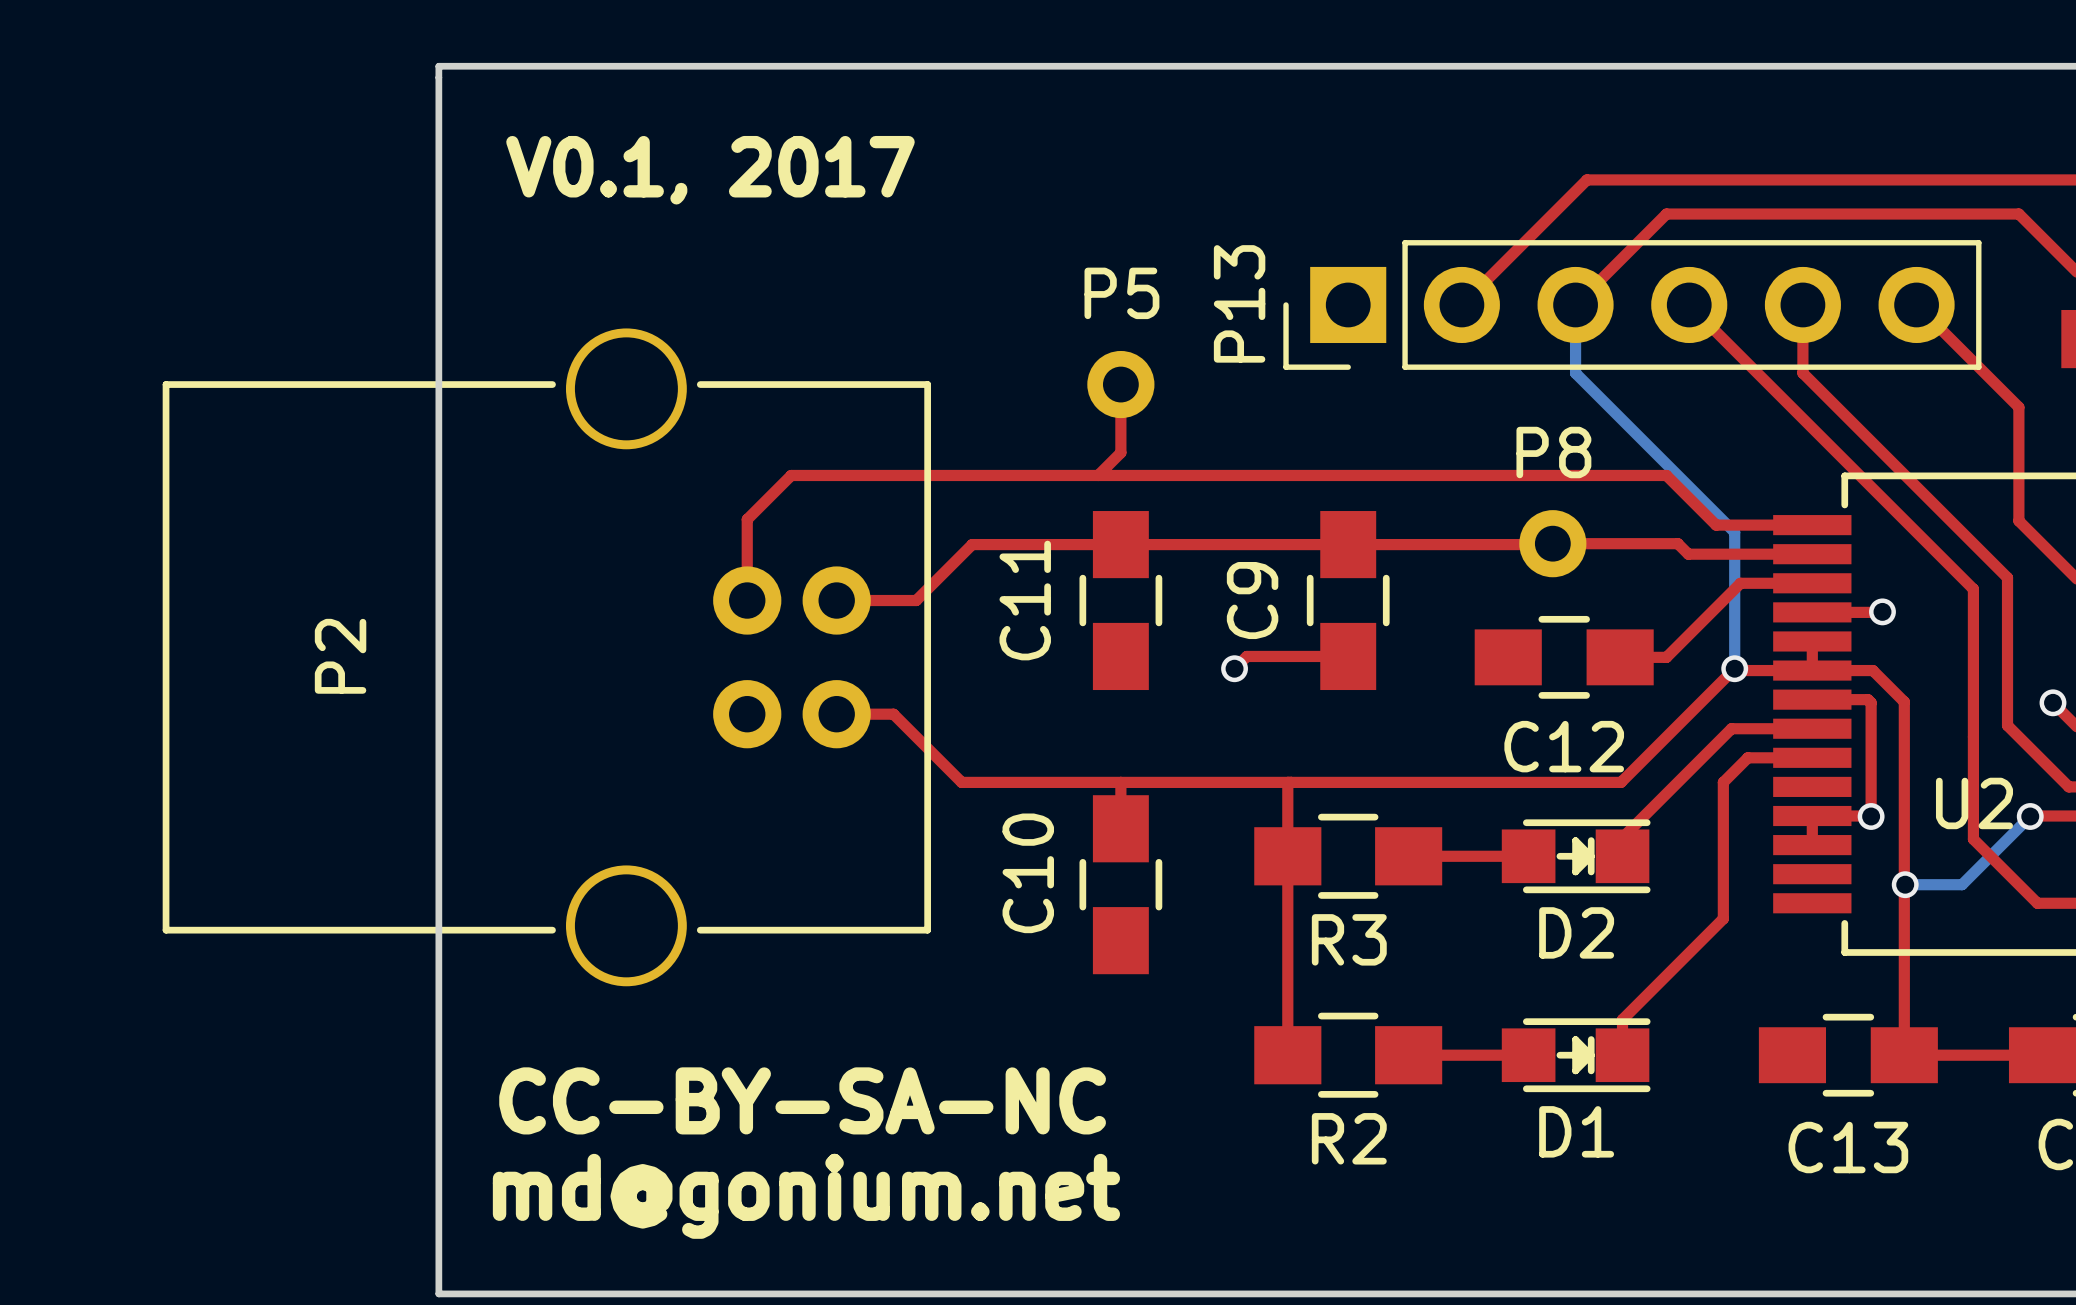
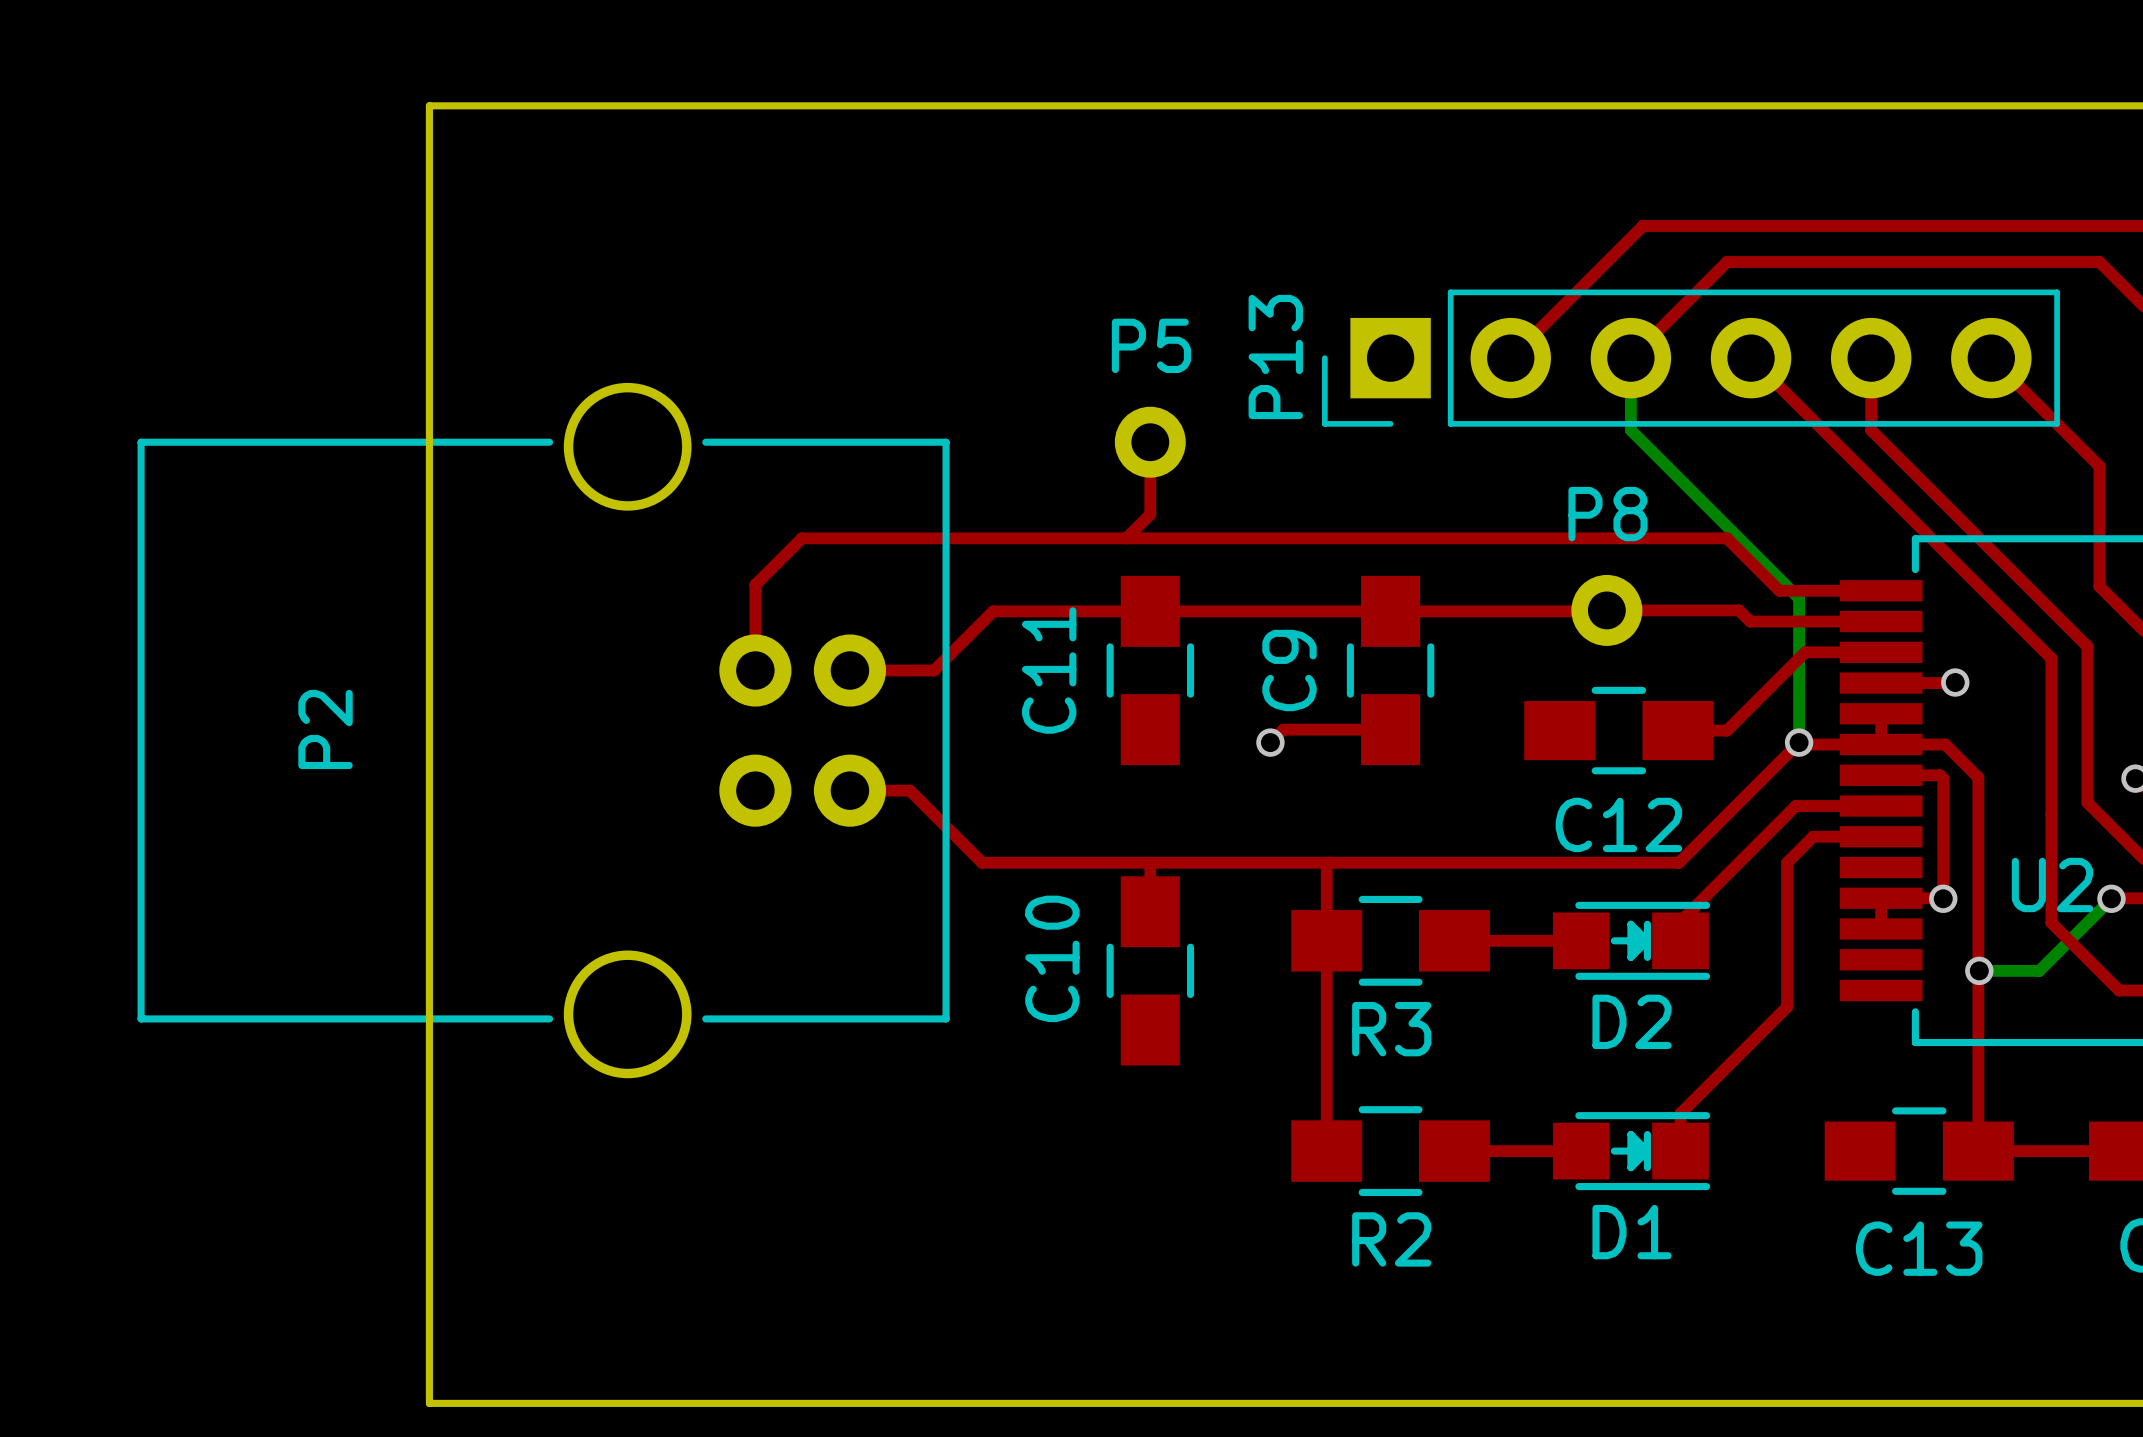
text: V0.1, 2017 (710, 170) -> none
text: CC-BY-SA-NC (802, 1100) -> none
text: md@gonium.net (806, 1196) -> none

